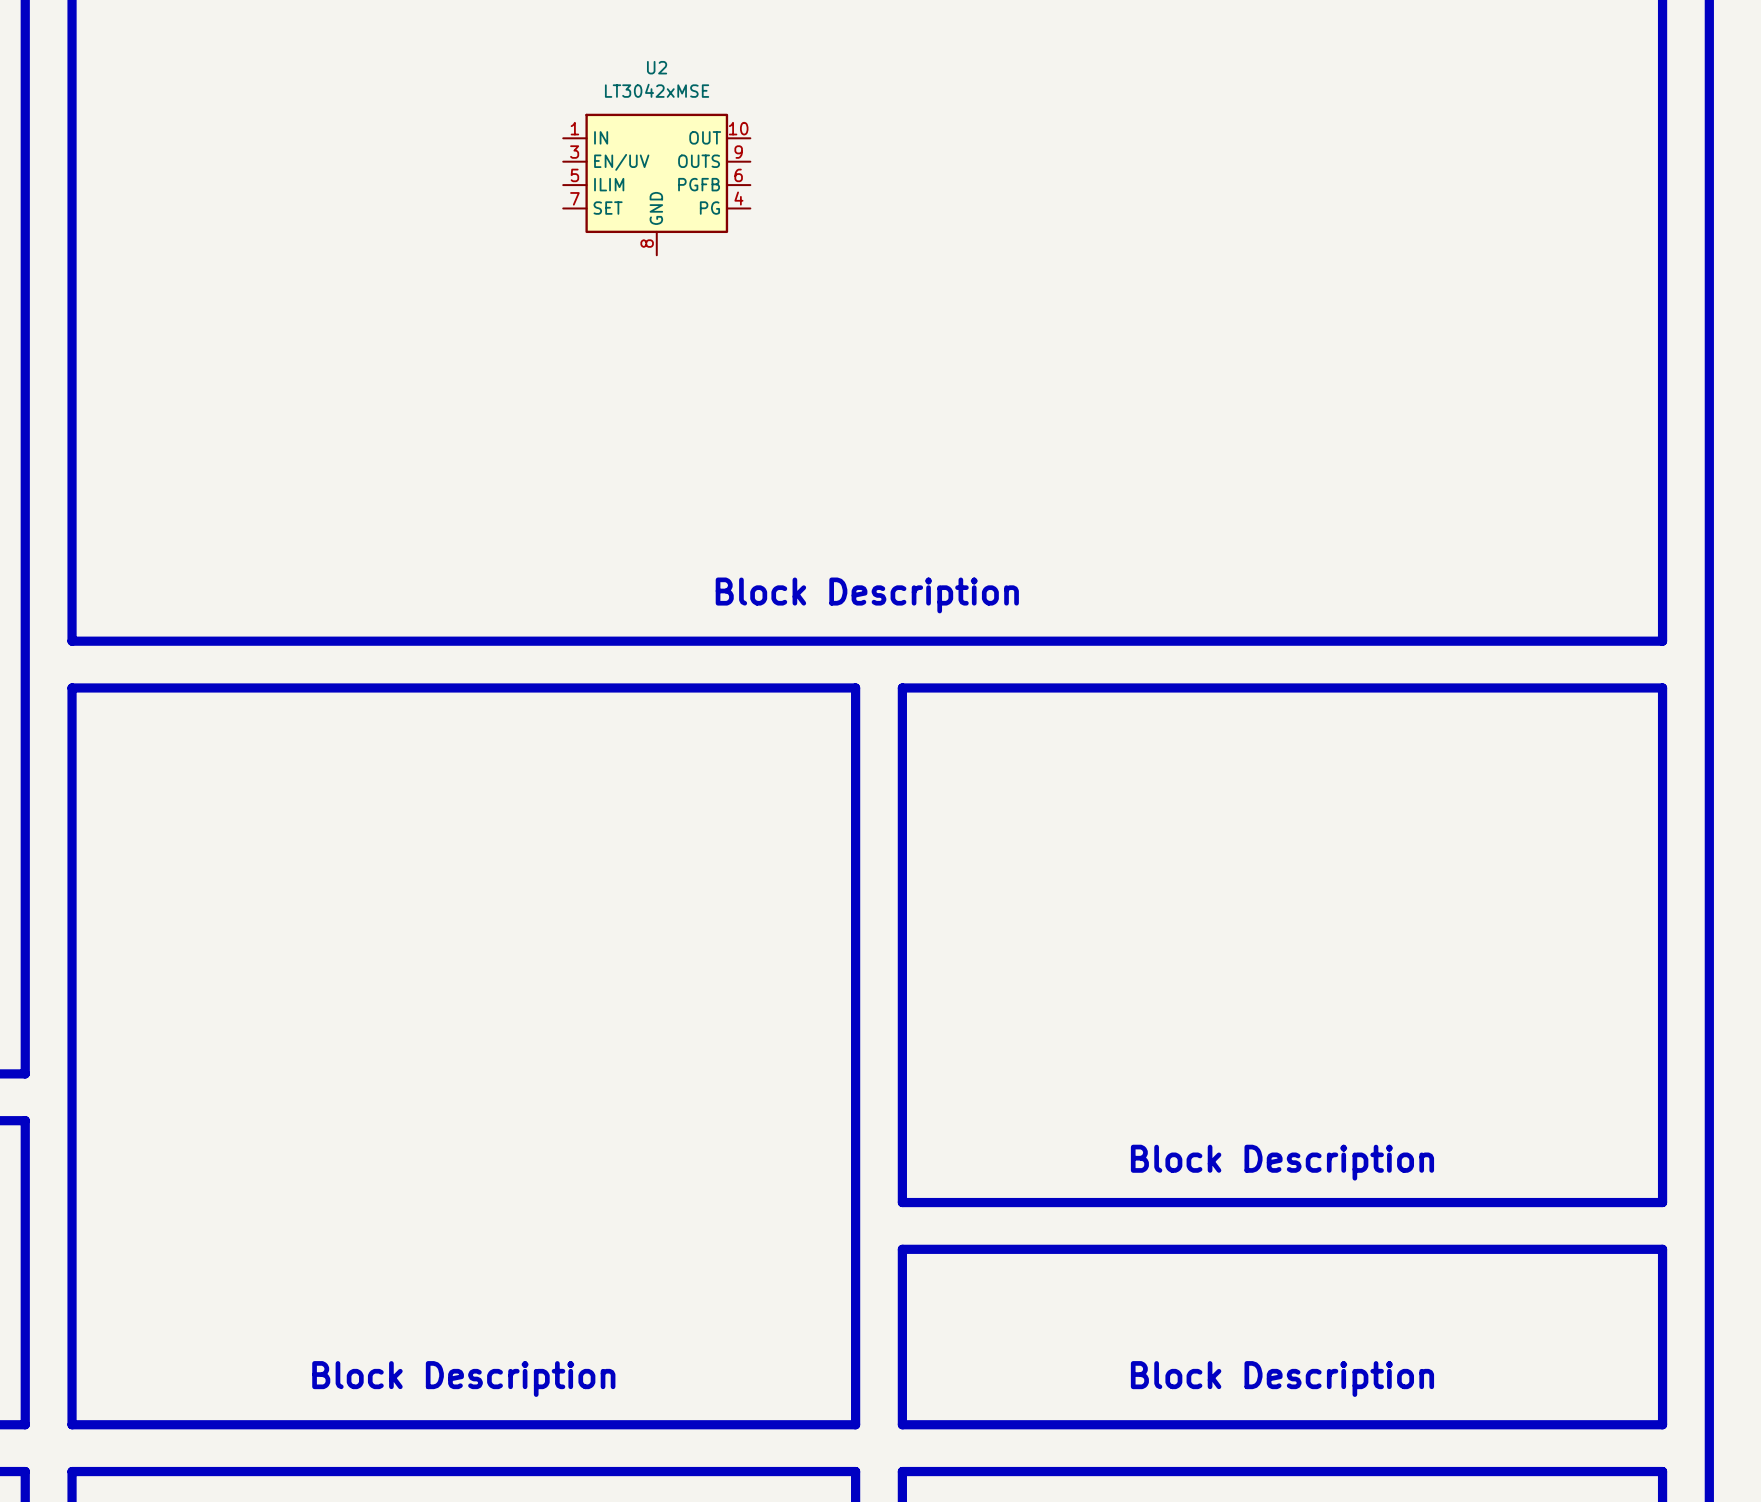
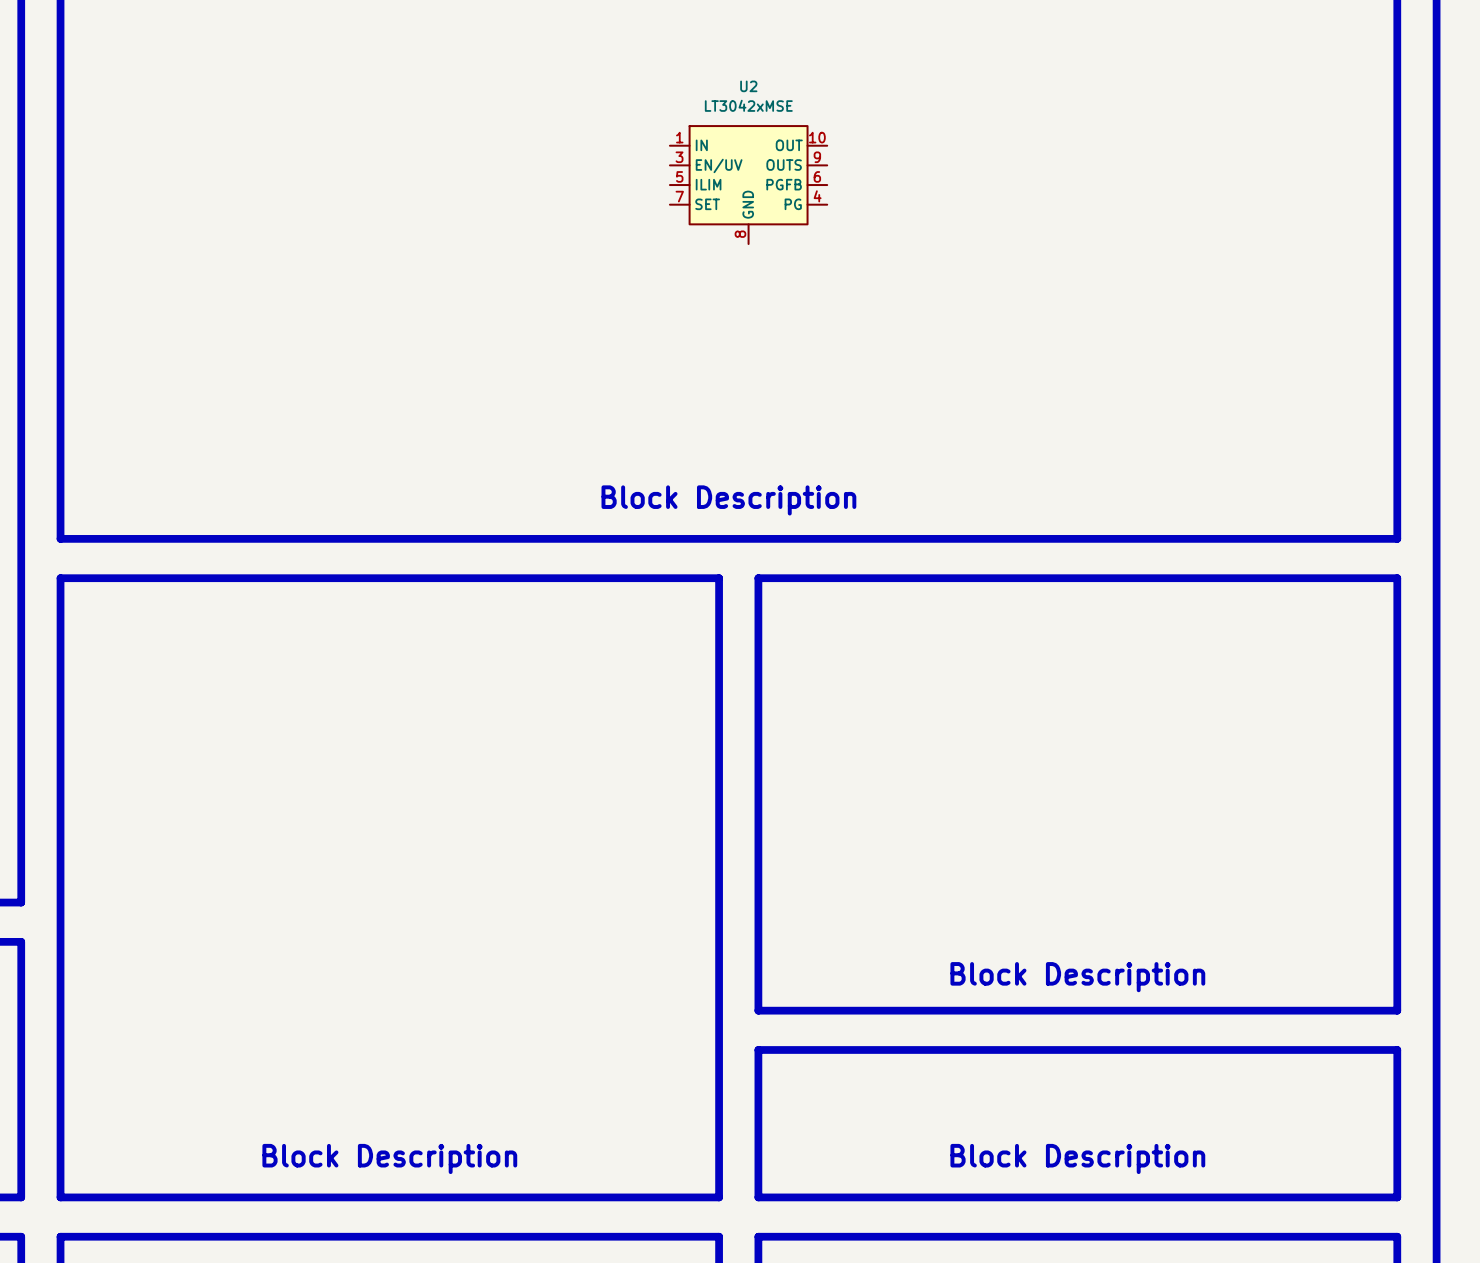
U2 position: (656, 184) -> (748, 184)

